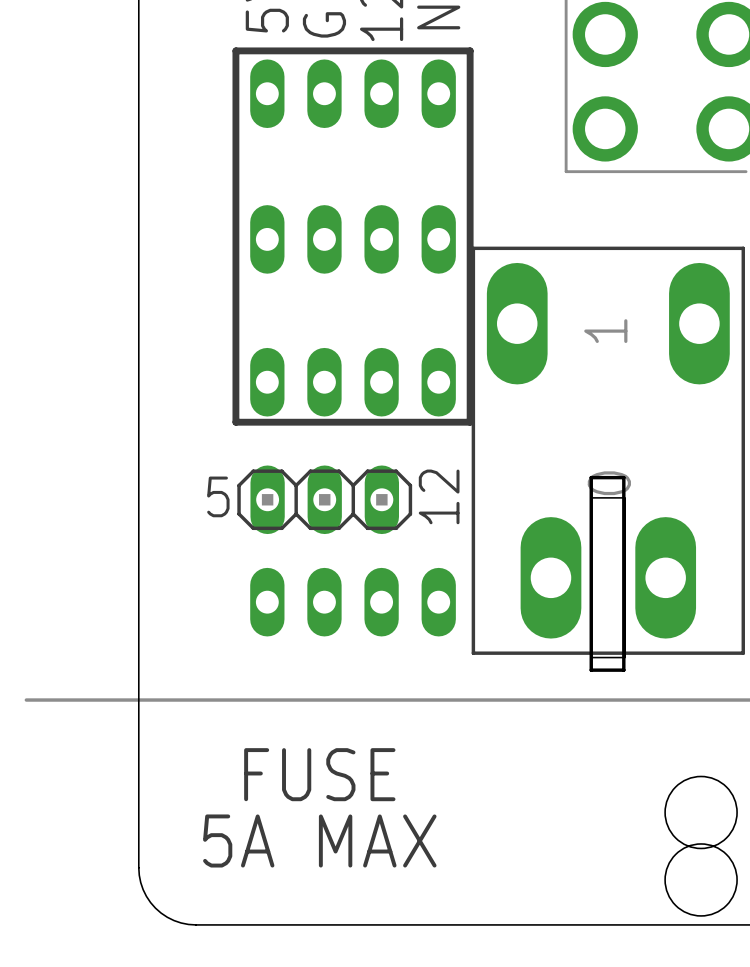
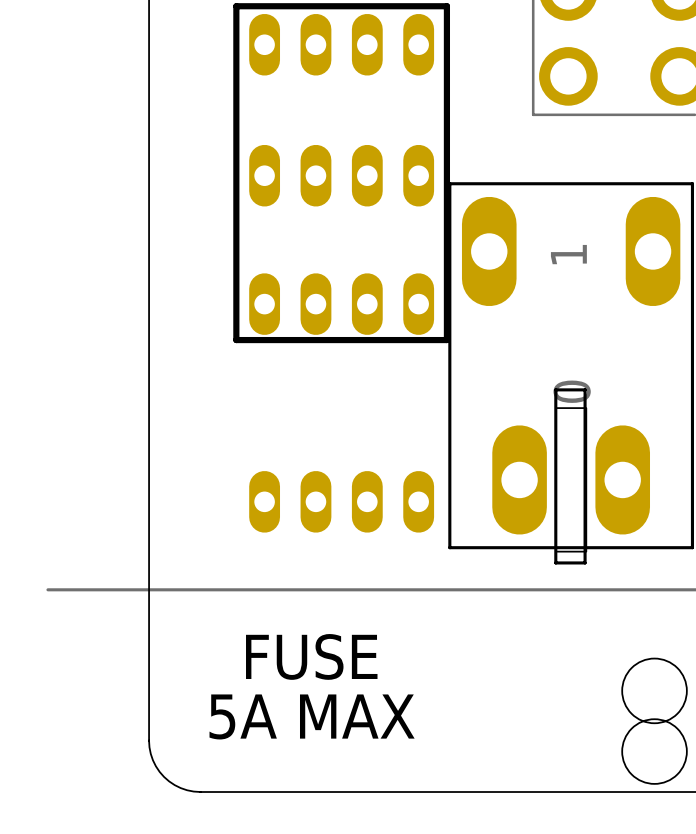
text: 5 (218, 496) -> none
text: 12 (439, 496) -> none
part: (324, 499) -> none

